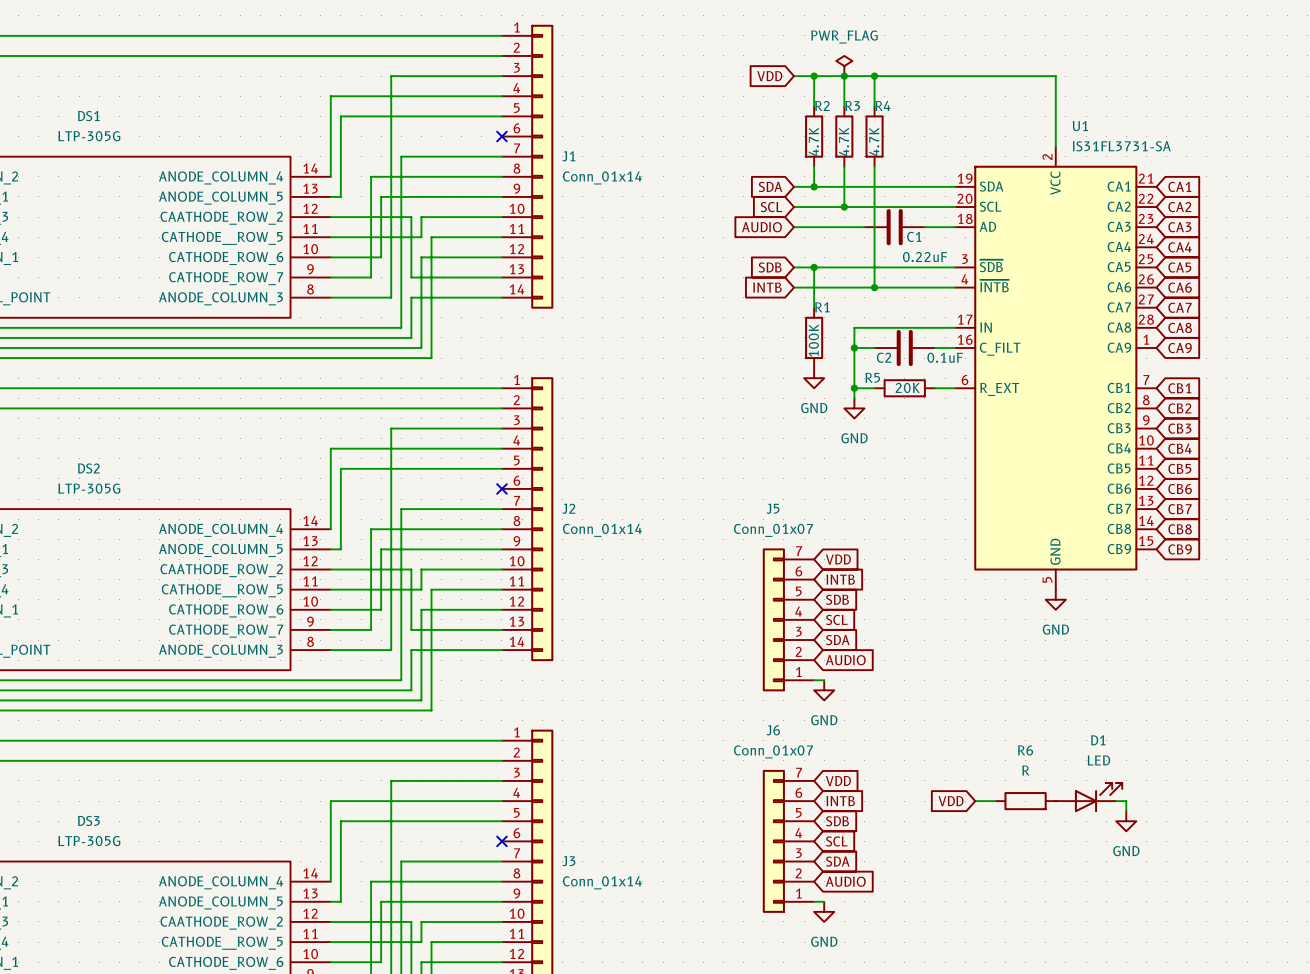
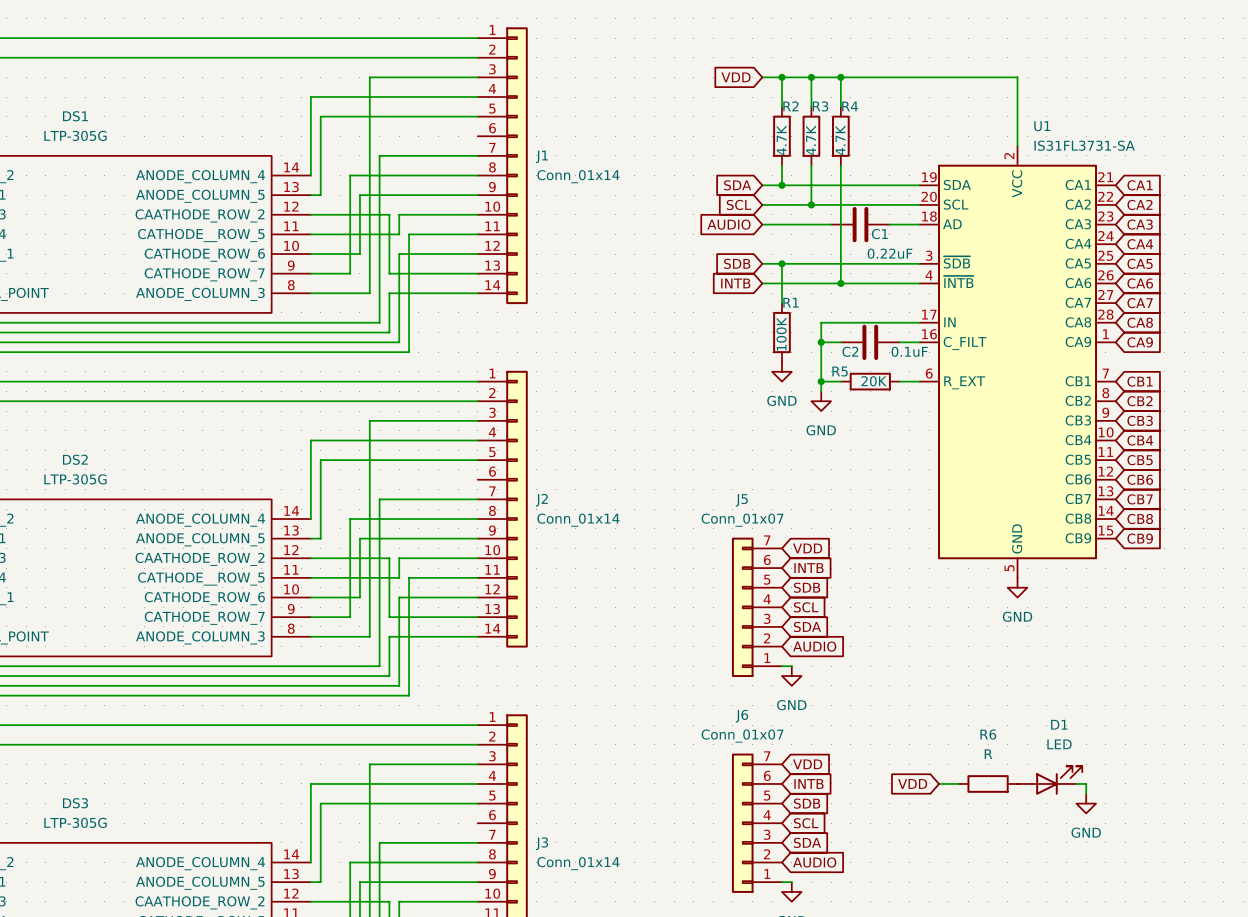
power symbol: PWR_FLAG (844, 66) -> none
no-connect mark: (501, 136) -> none
no-connect mark: (501, 488) -> none
no-connect mark: (501, 841) -> none

